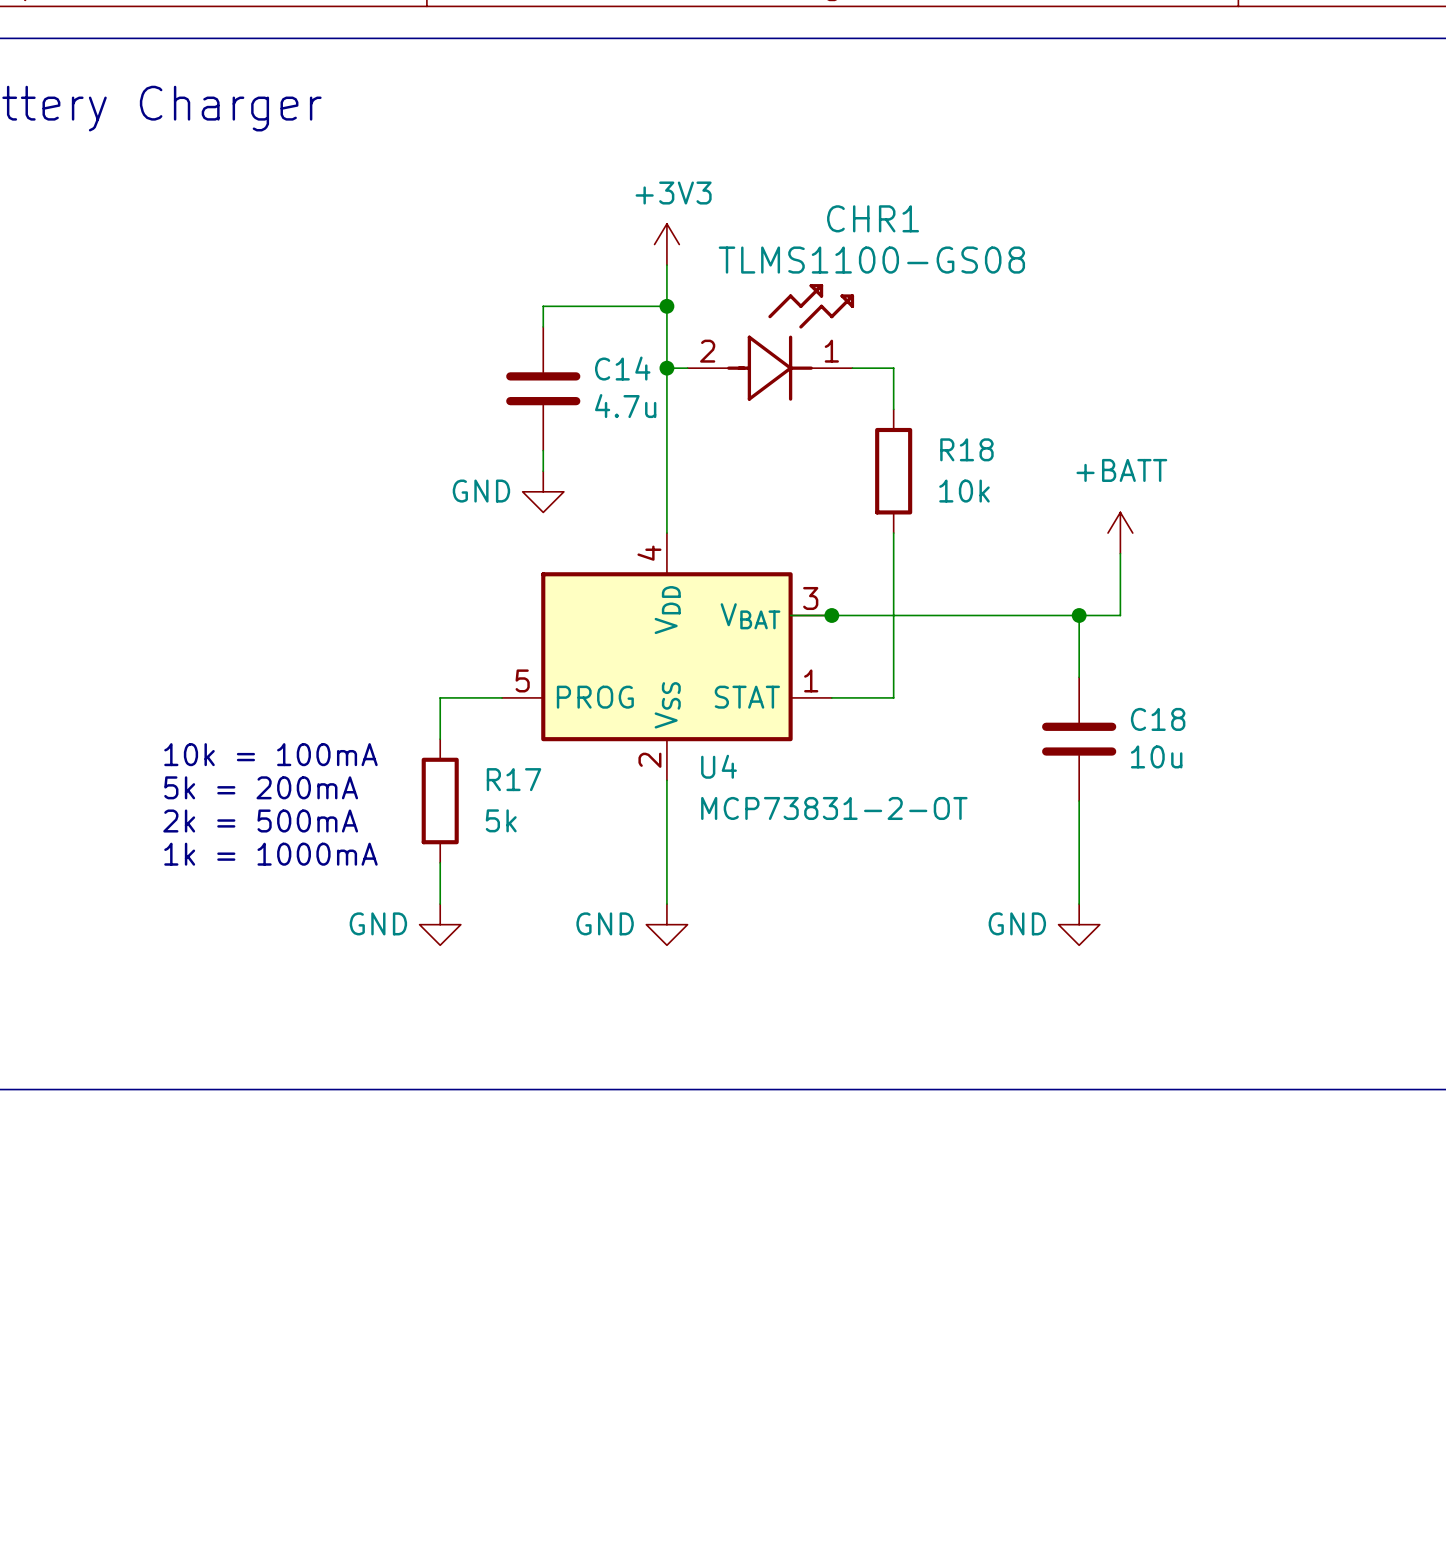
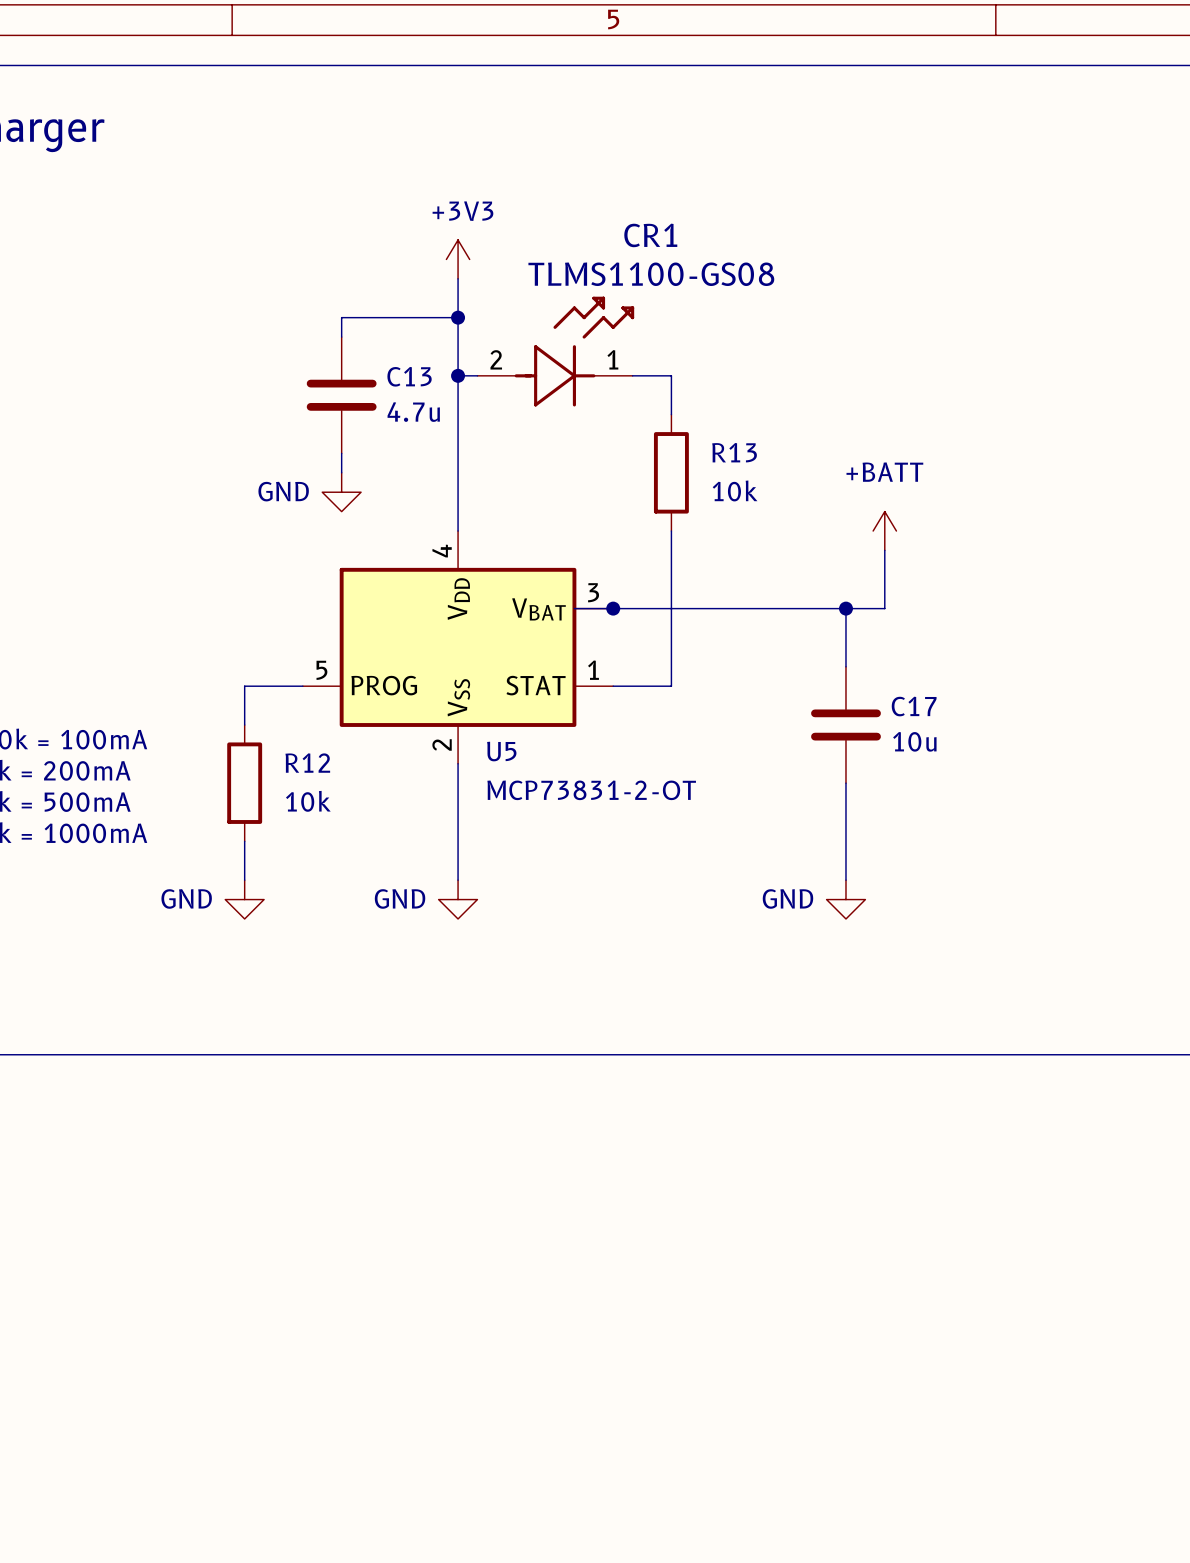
CHR1 name: CHR1 (873, 218) -> CR1 (650, 235)
C14 name: C14 (622, 368) -> C13 (409, 376)
R18 name: R18 (966, 449) -> R13 (734, 452)
C18 name: C18 (1158, 719) -> C17 (914, 706)
U4 name: U4 (719, 766) -> U5 (501, 751)
R17 name: R17 (513, 779) -> R12 (307, 763)
R17 value: 5k (501, 820) -> 10k (308, 801)

